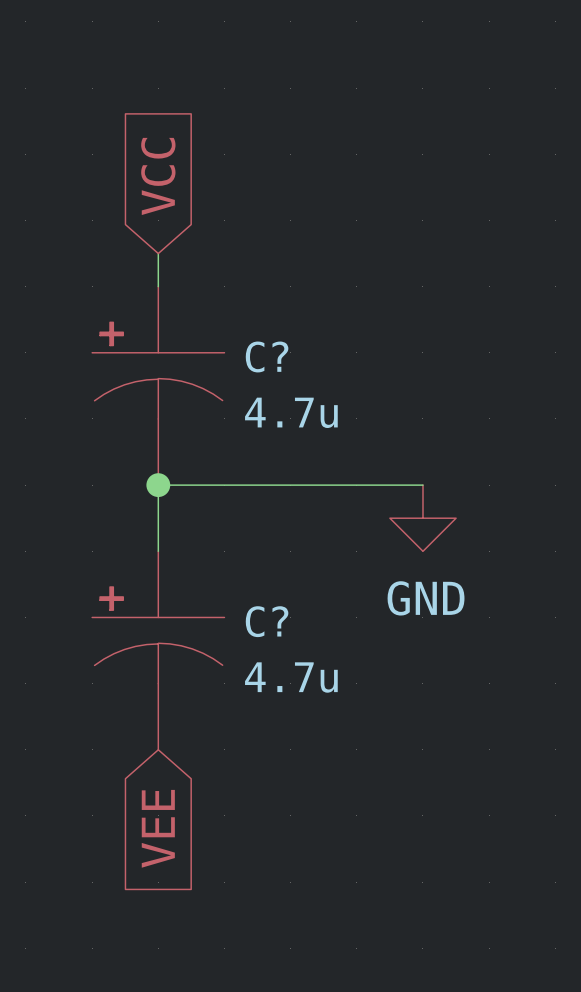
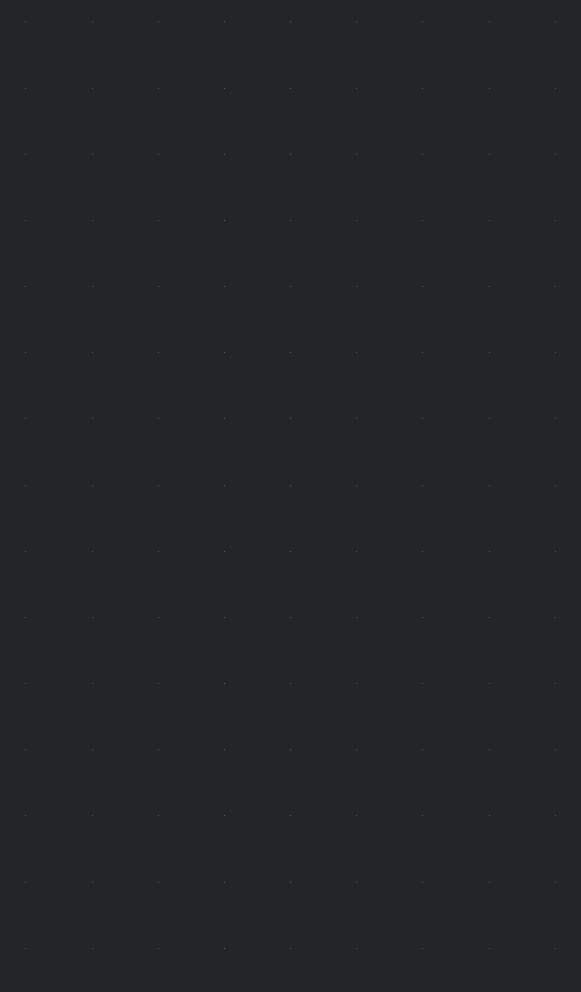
global label: VCC (158, 176) -> none
wire: (158, 253) (158, 286) -> none
C?: 4.7u (158, 385) -> none
junction: (158, 485) -> none
wire: (422, 485) (158, 485) (158, 551) -> none
power symbol: GND (422, 518) -> none
C?: 4.7u (158, 650) -> none
global label: VEE (158, 828) -> none

